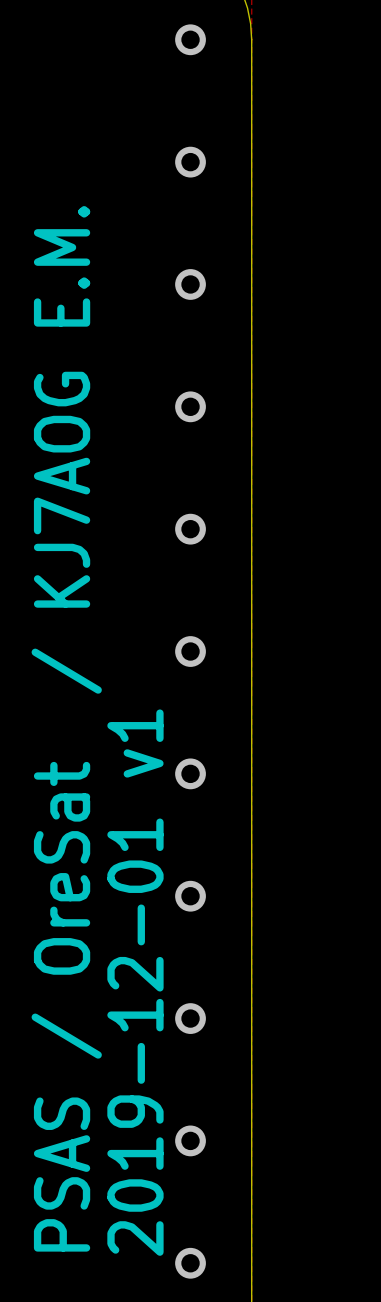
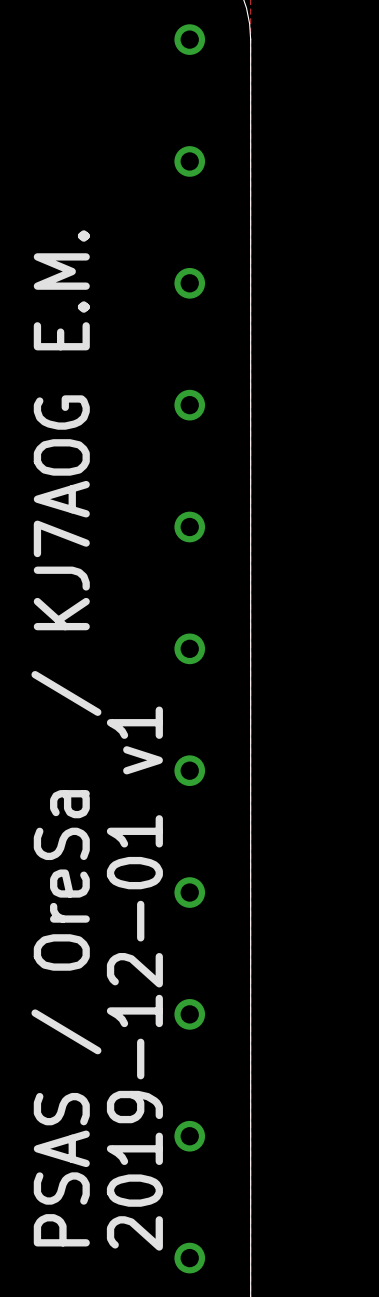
text: PSAS / OreSat / KJ7AOG E.M. (66, 728) -> PSAS / OreSa / KJ7AOG E.M. (66, 738)

